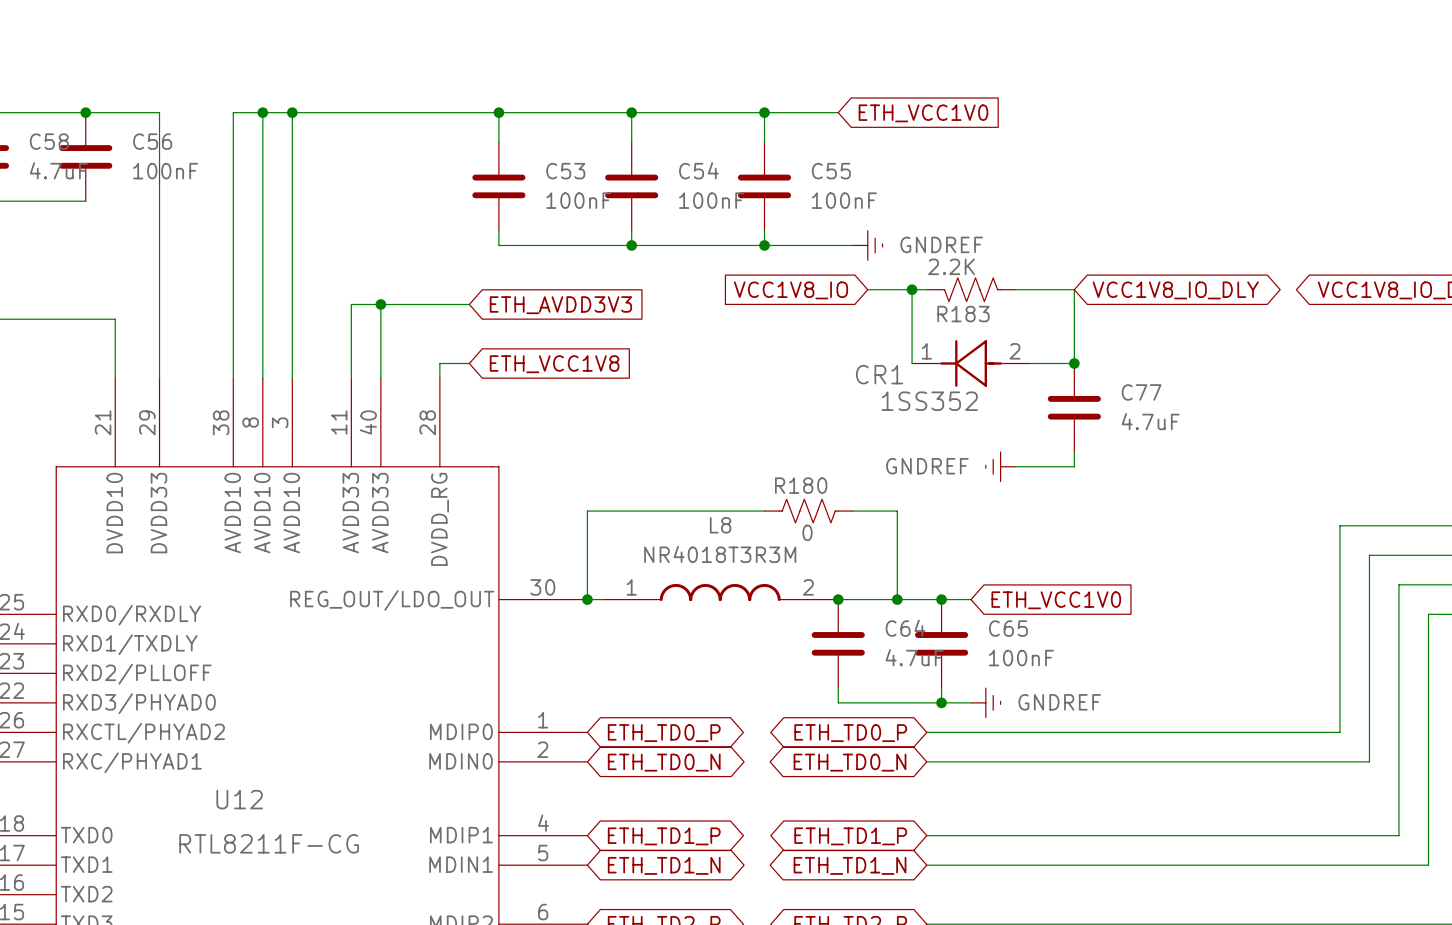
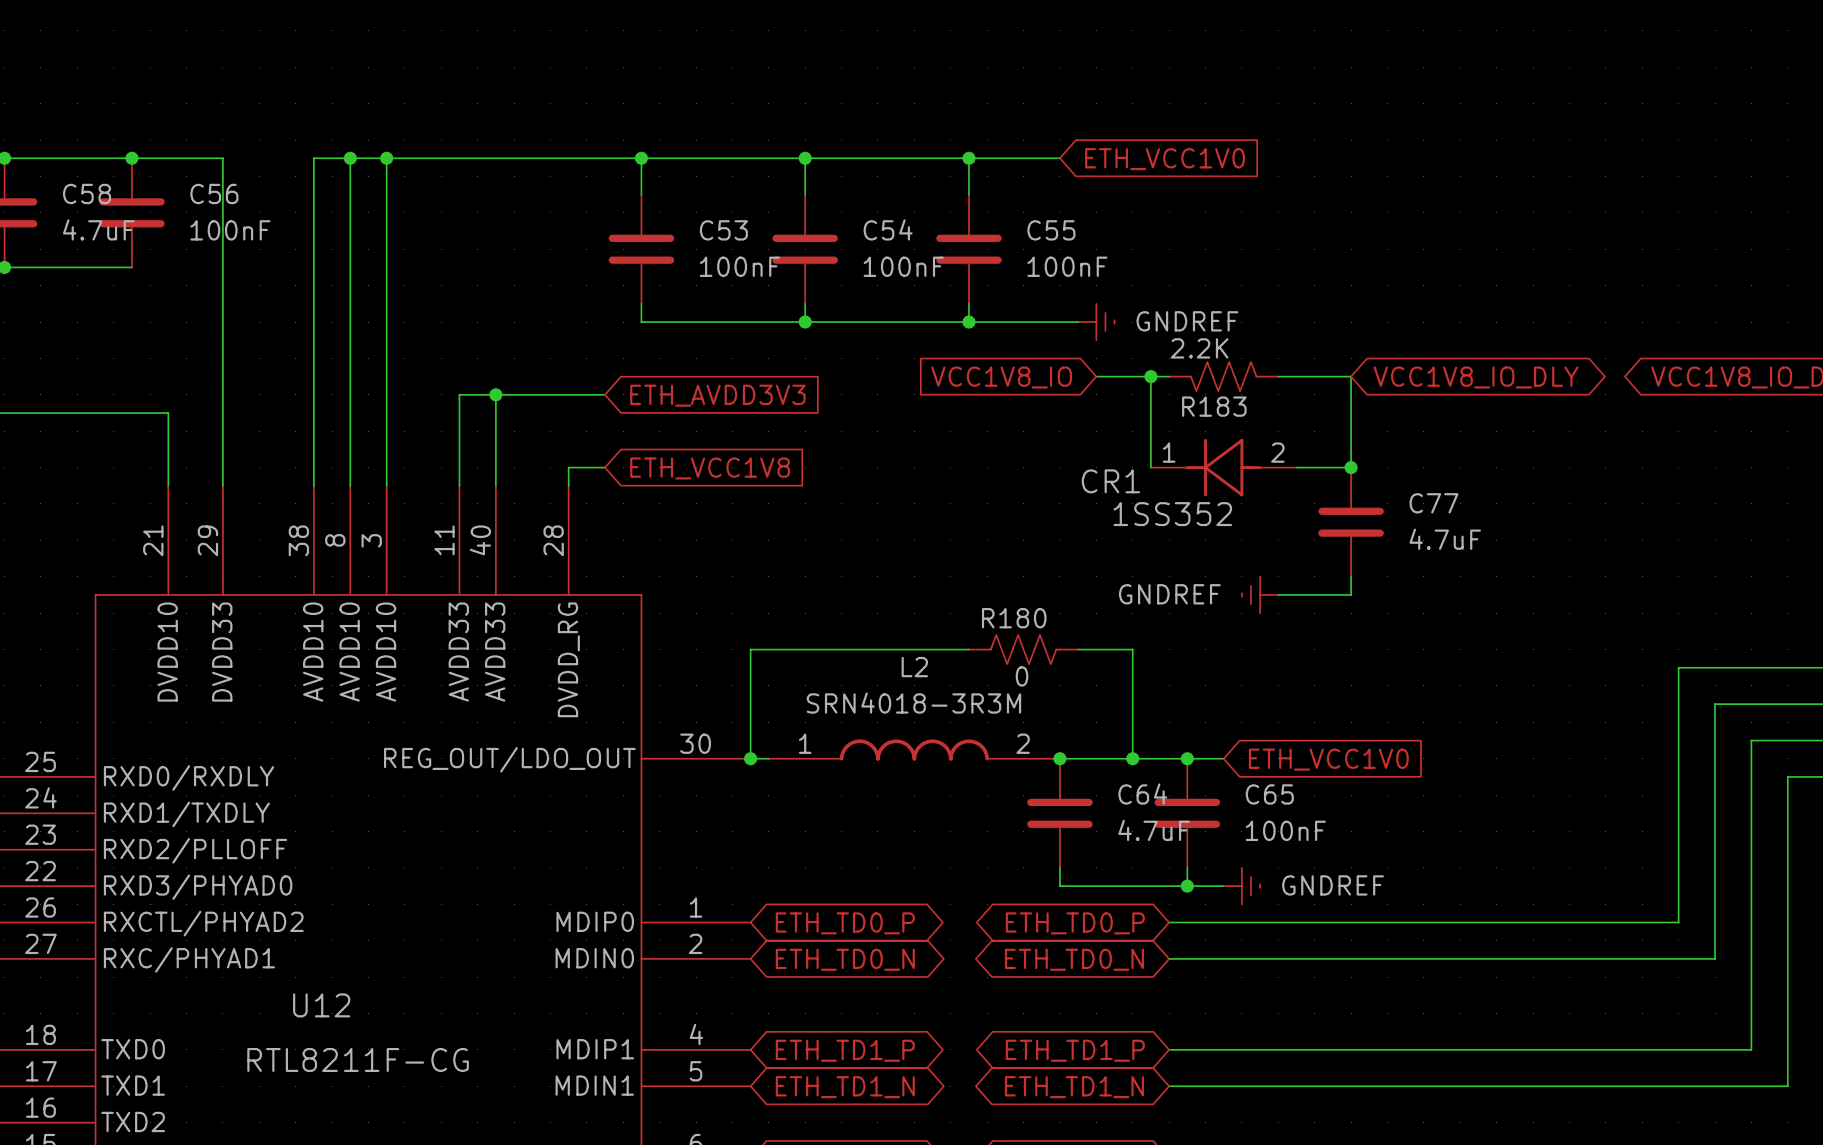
L8 name: L8 (720, 525) -> L2 (914, 667)
L8 value: NR4018T3R3M (720, 554) -> SRN4018-3R3M (913, 703)

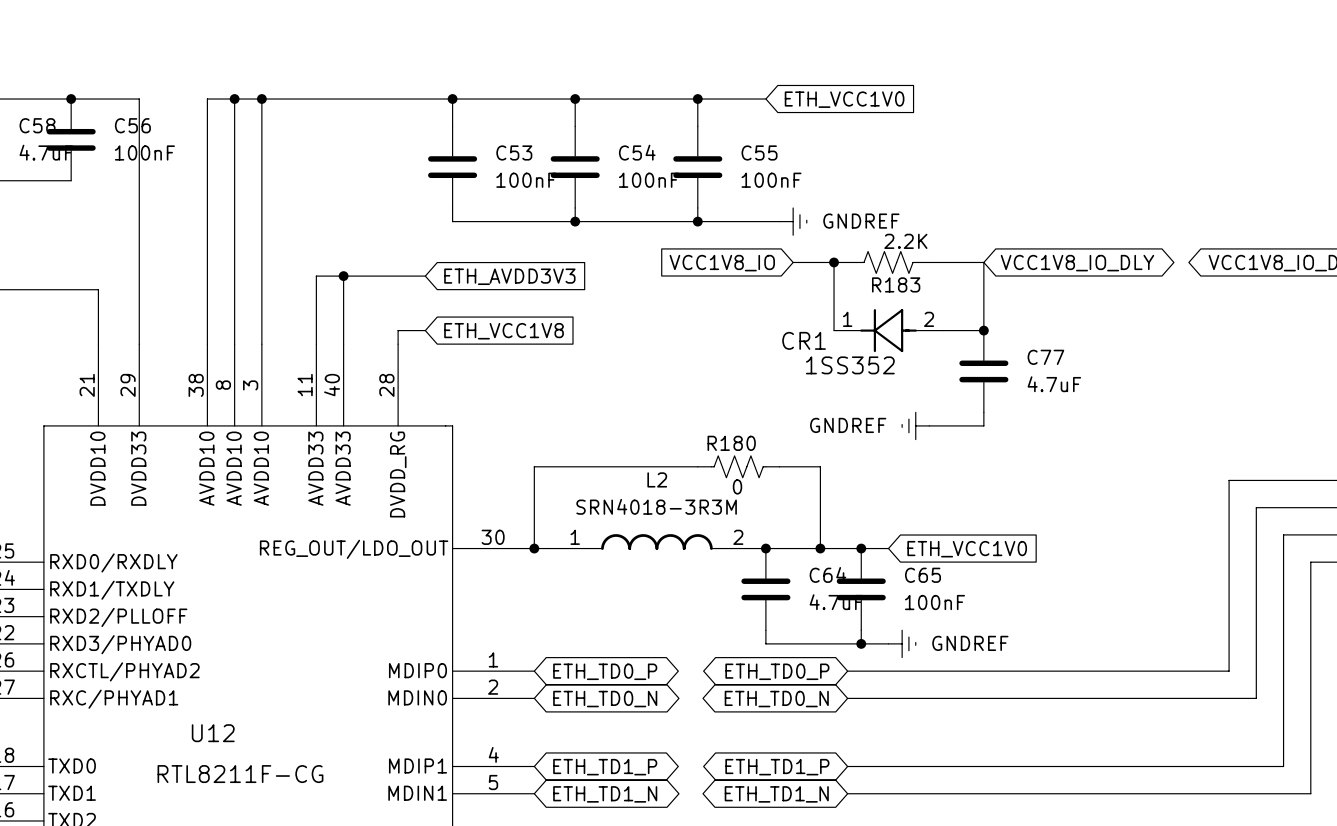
R183 flip: as is (1223, 376) -> left-right (888, 262)

